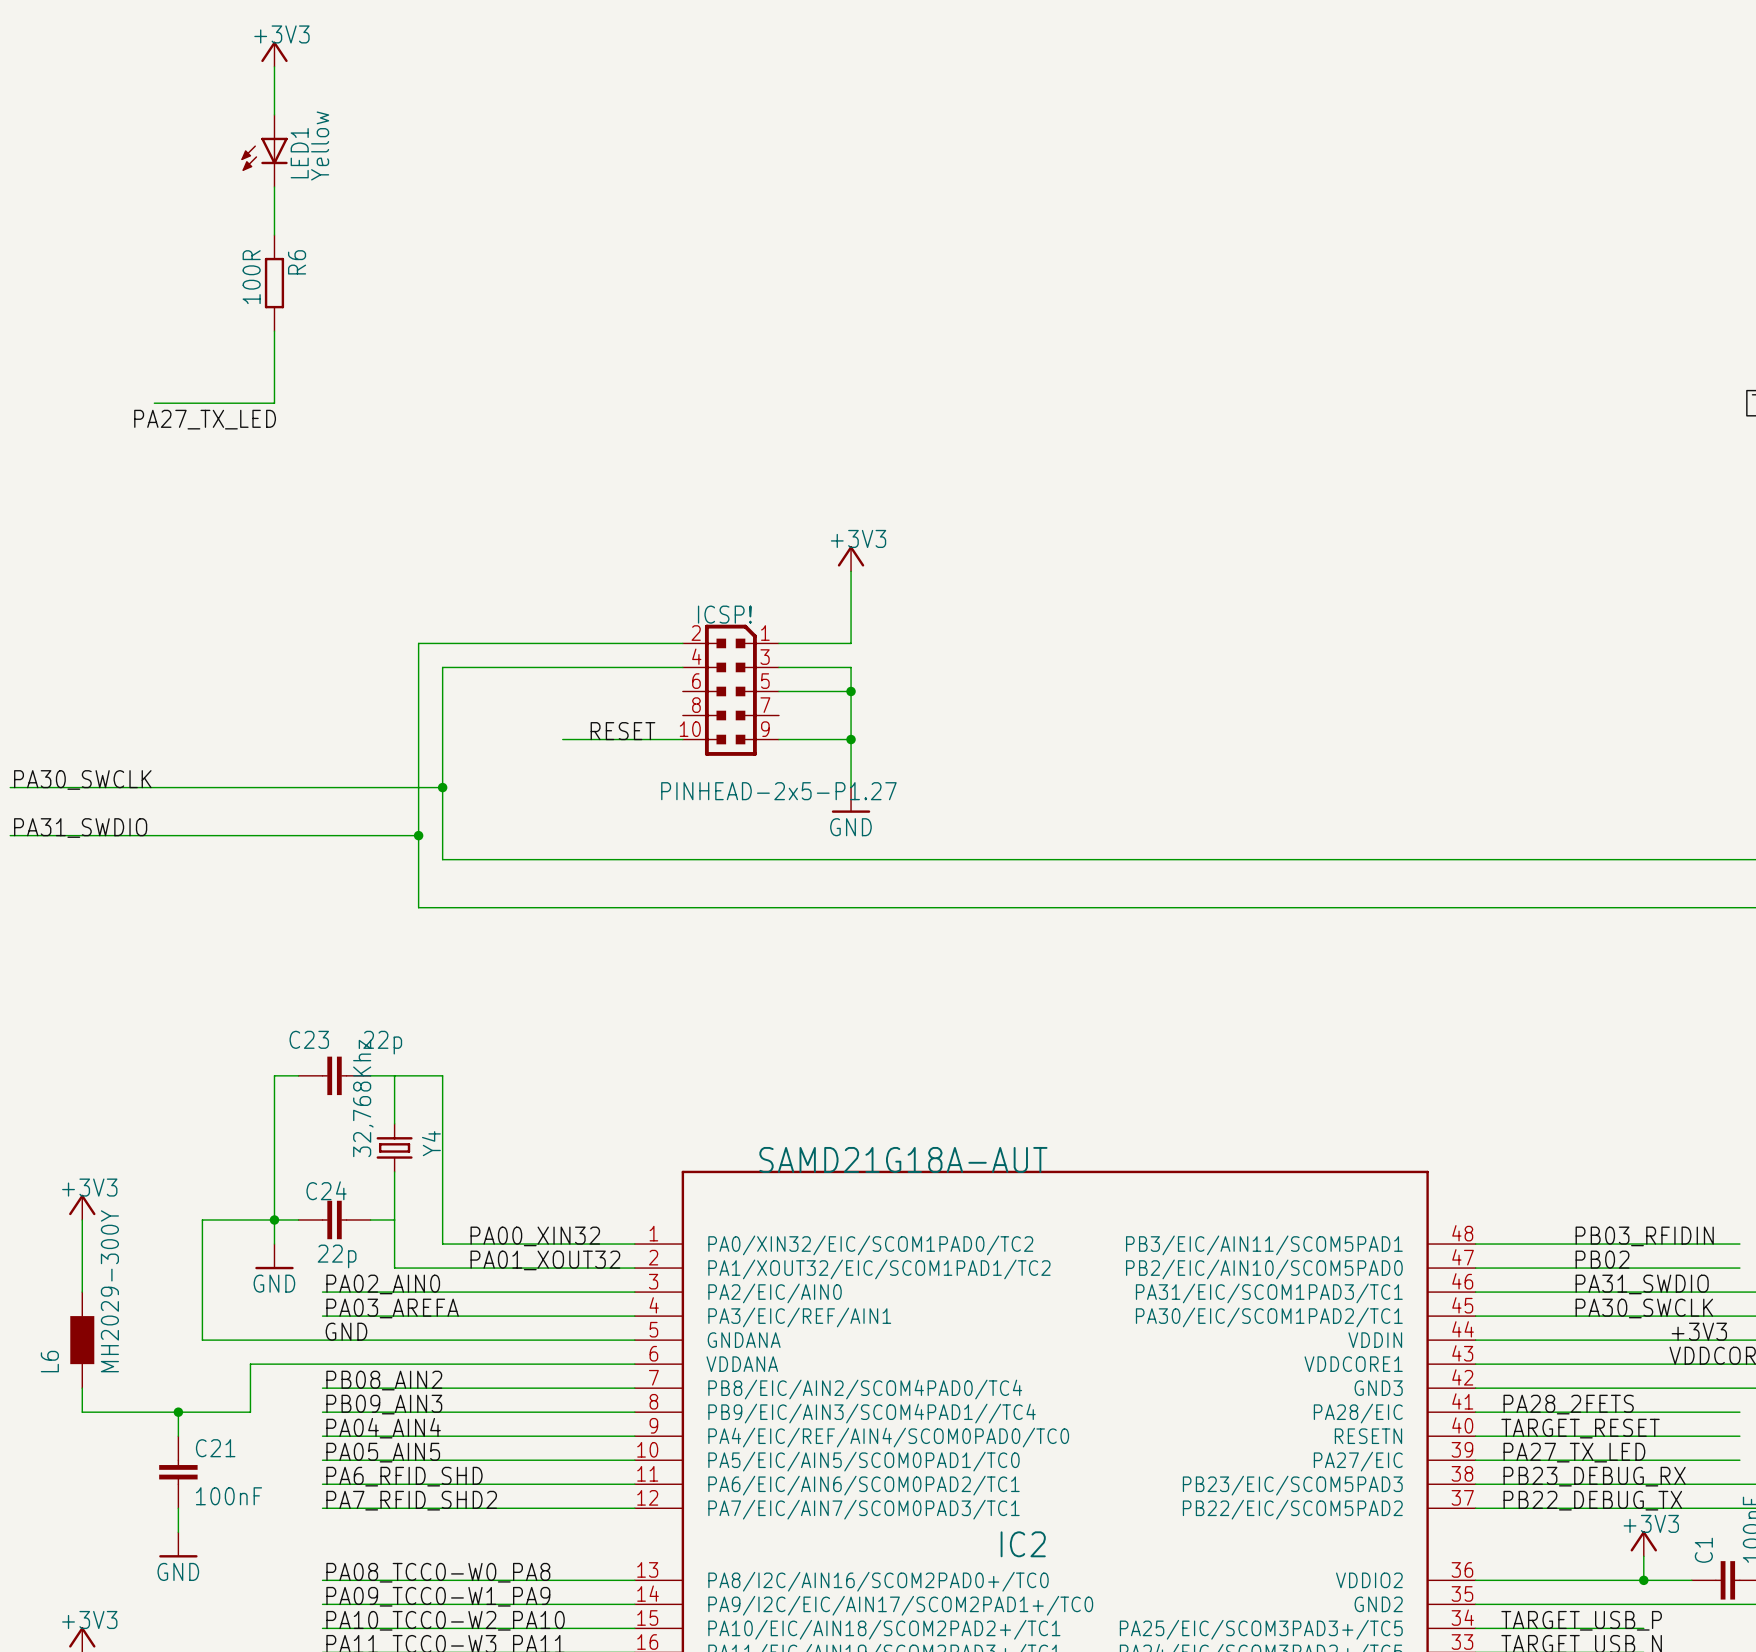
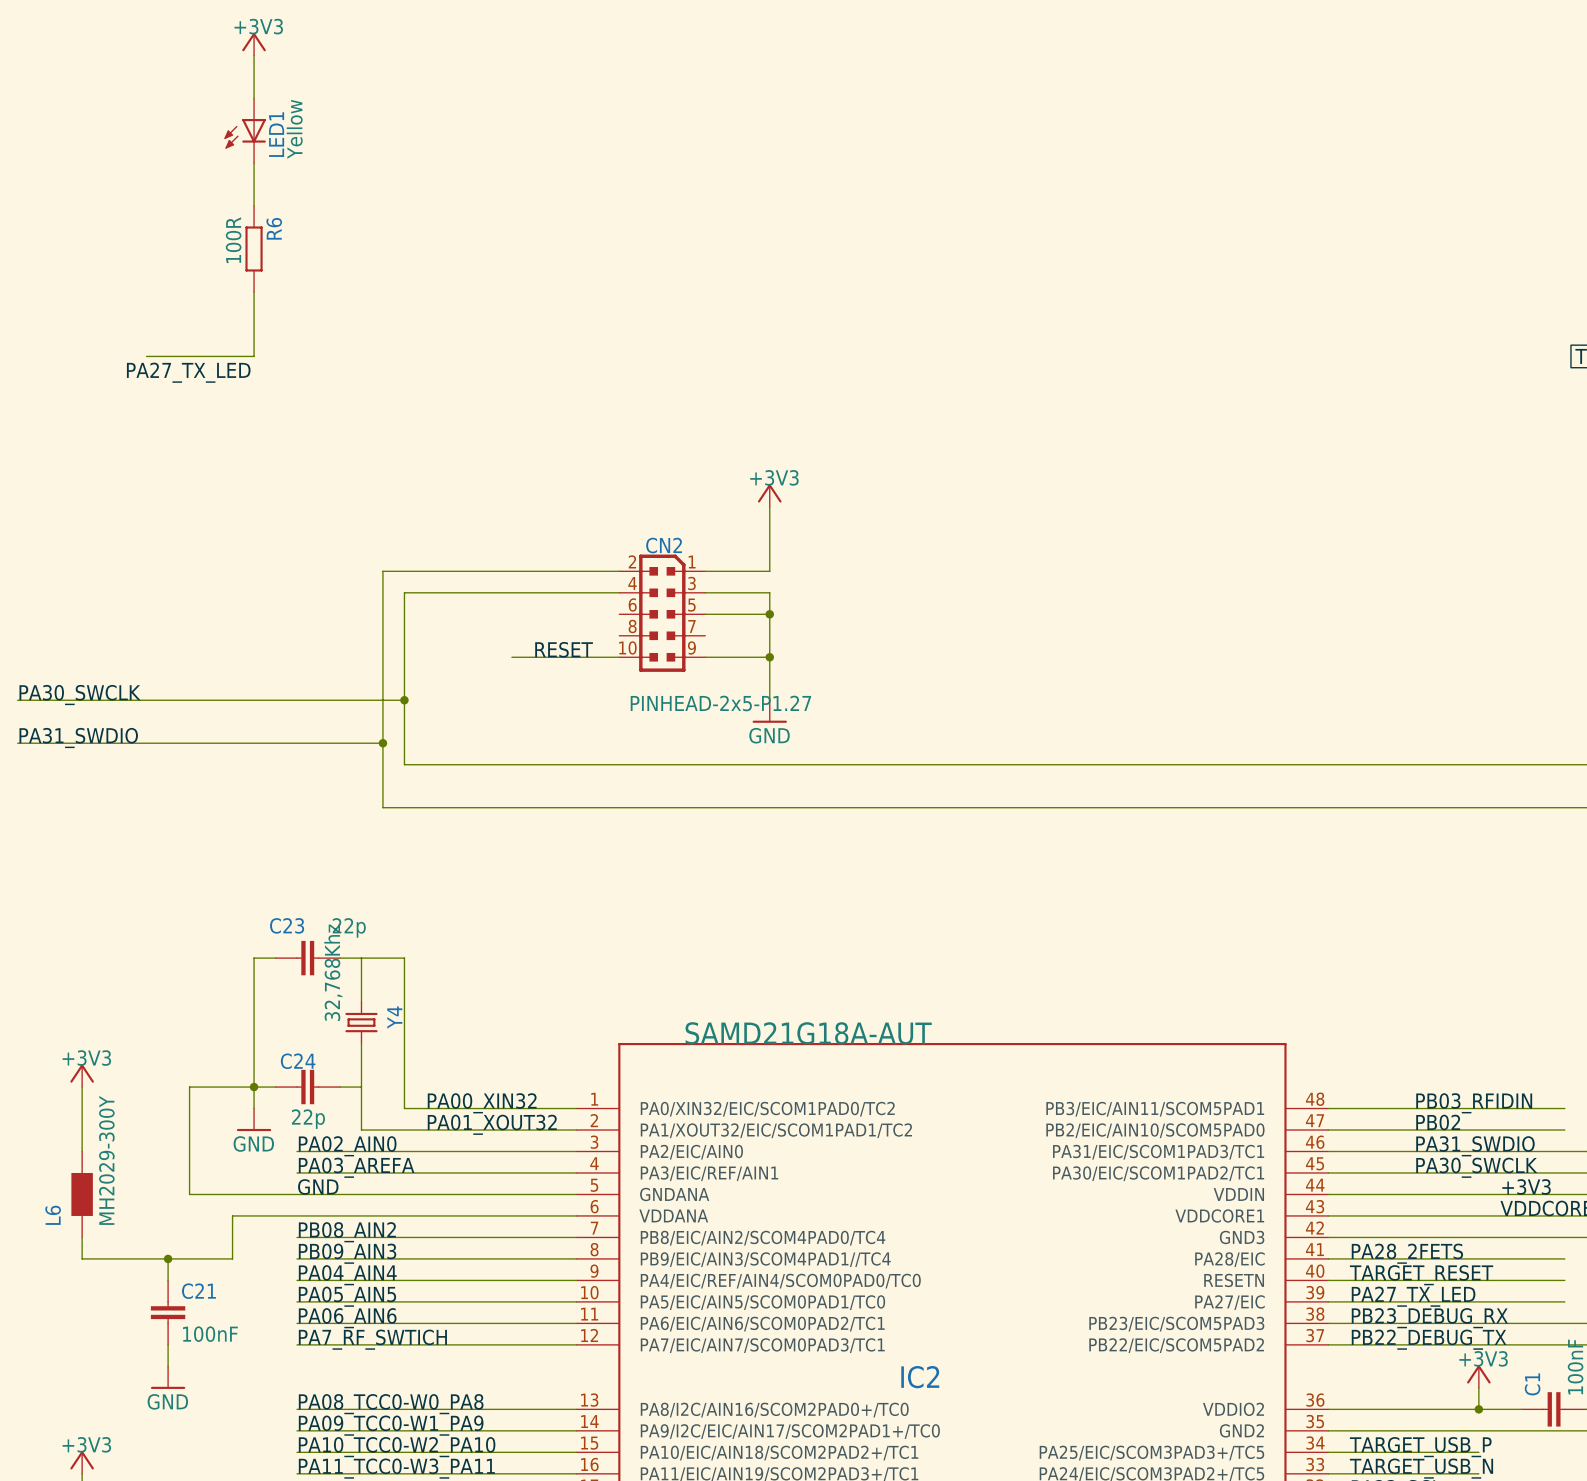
ICSP! name: ICSP! (724, 614) -> CN2 (664, 545)
label: PA6_RFID_SHD (404, 1476) -> PA06_AIN6 (347, 1318)
label: PA7_RFID_SHD2 (411, 1500) -> PA7_RF_SWTICH (372, 1339)

